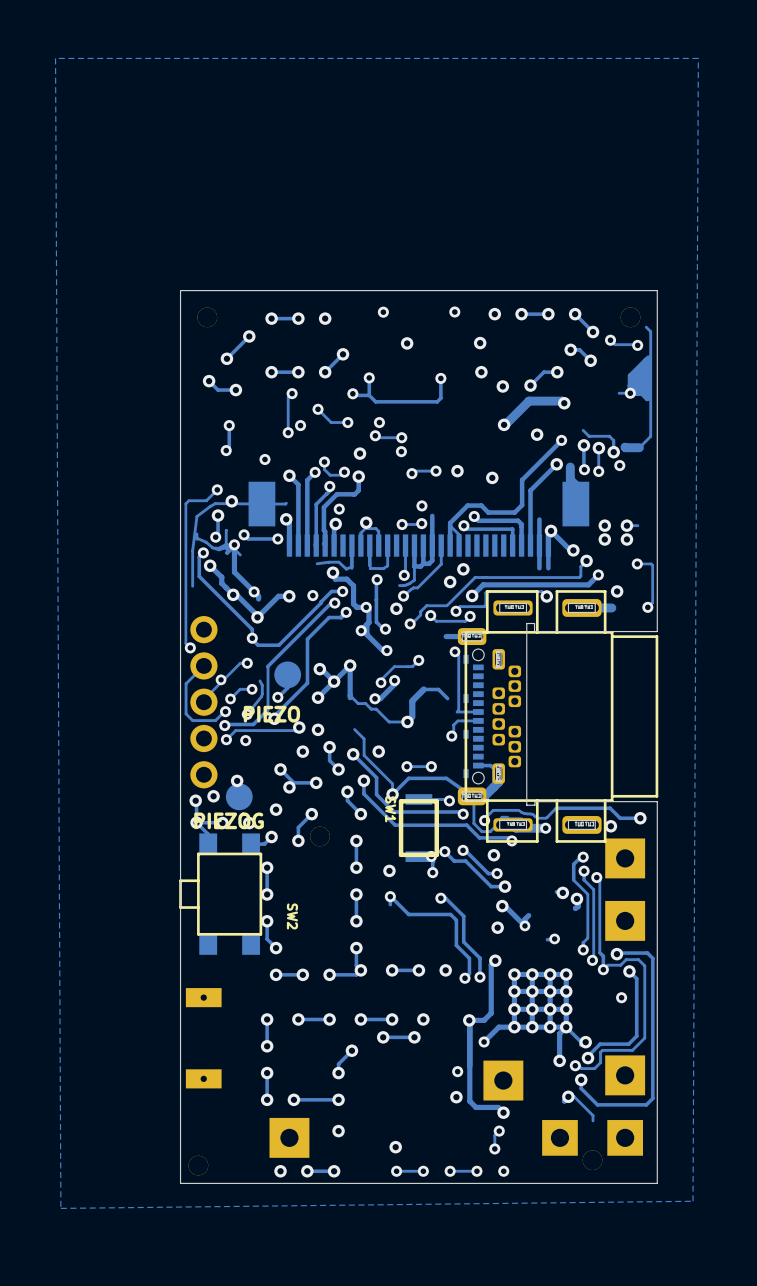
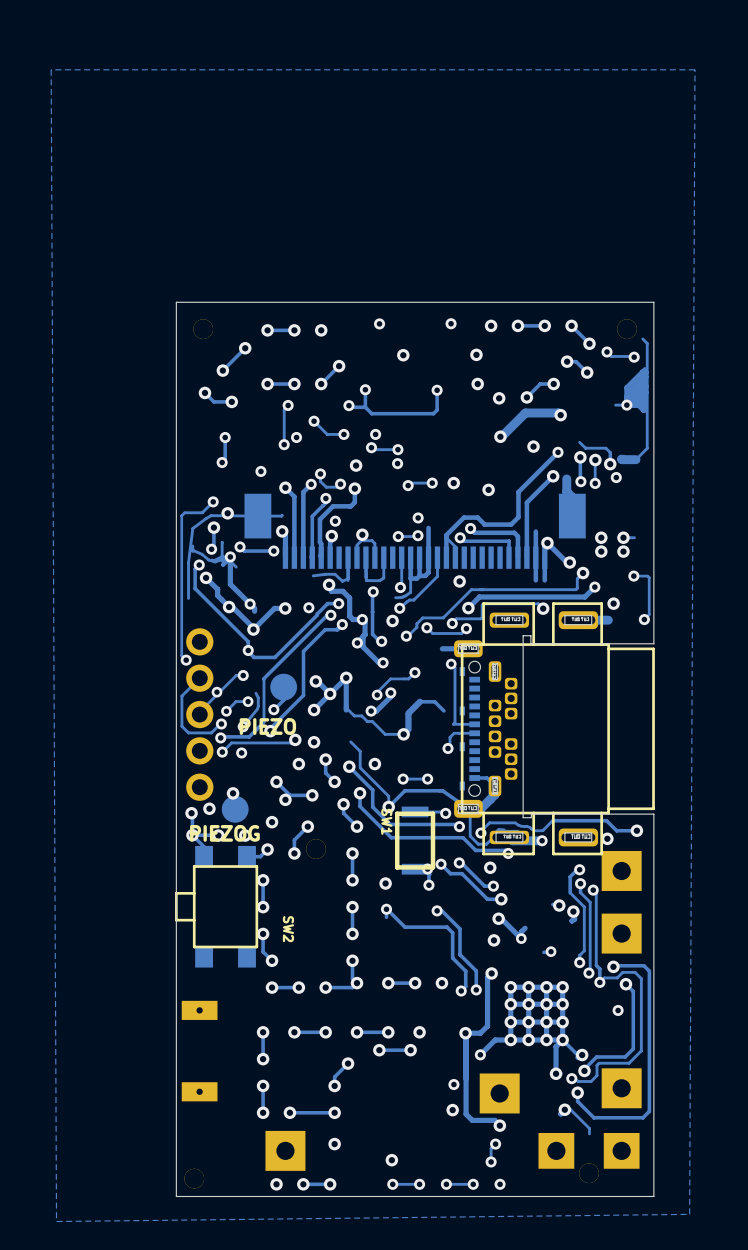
via: (450, 582) -> none

